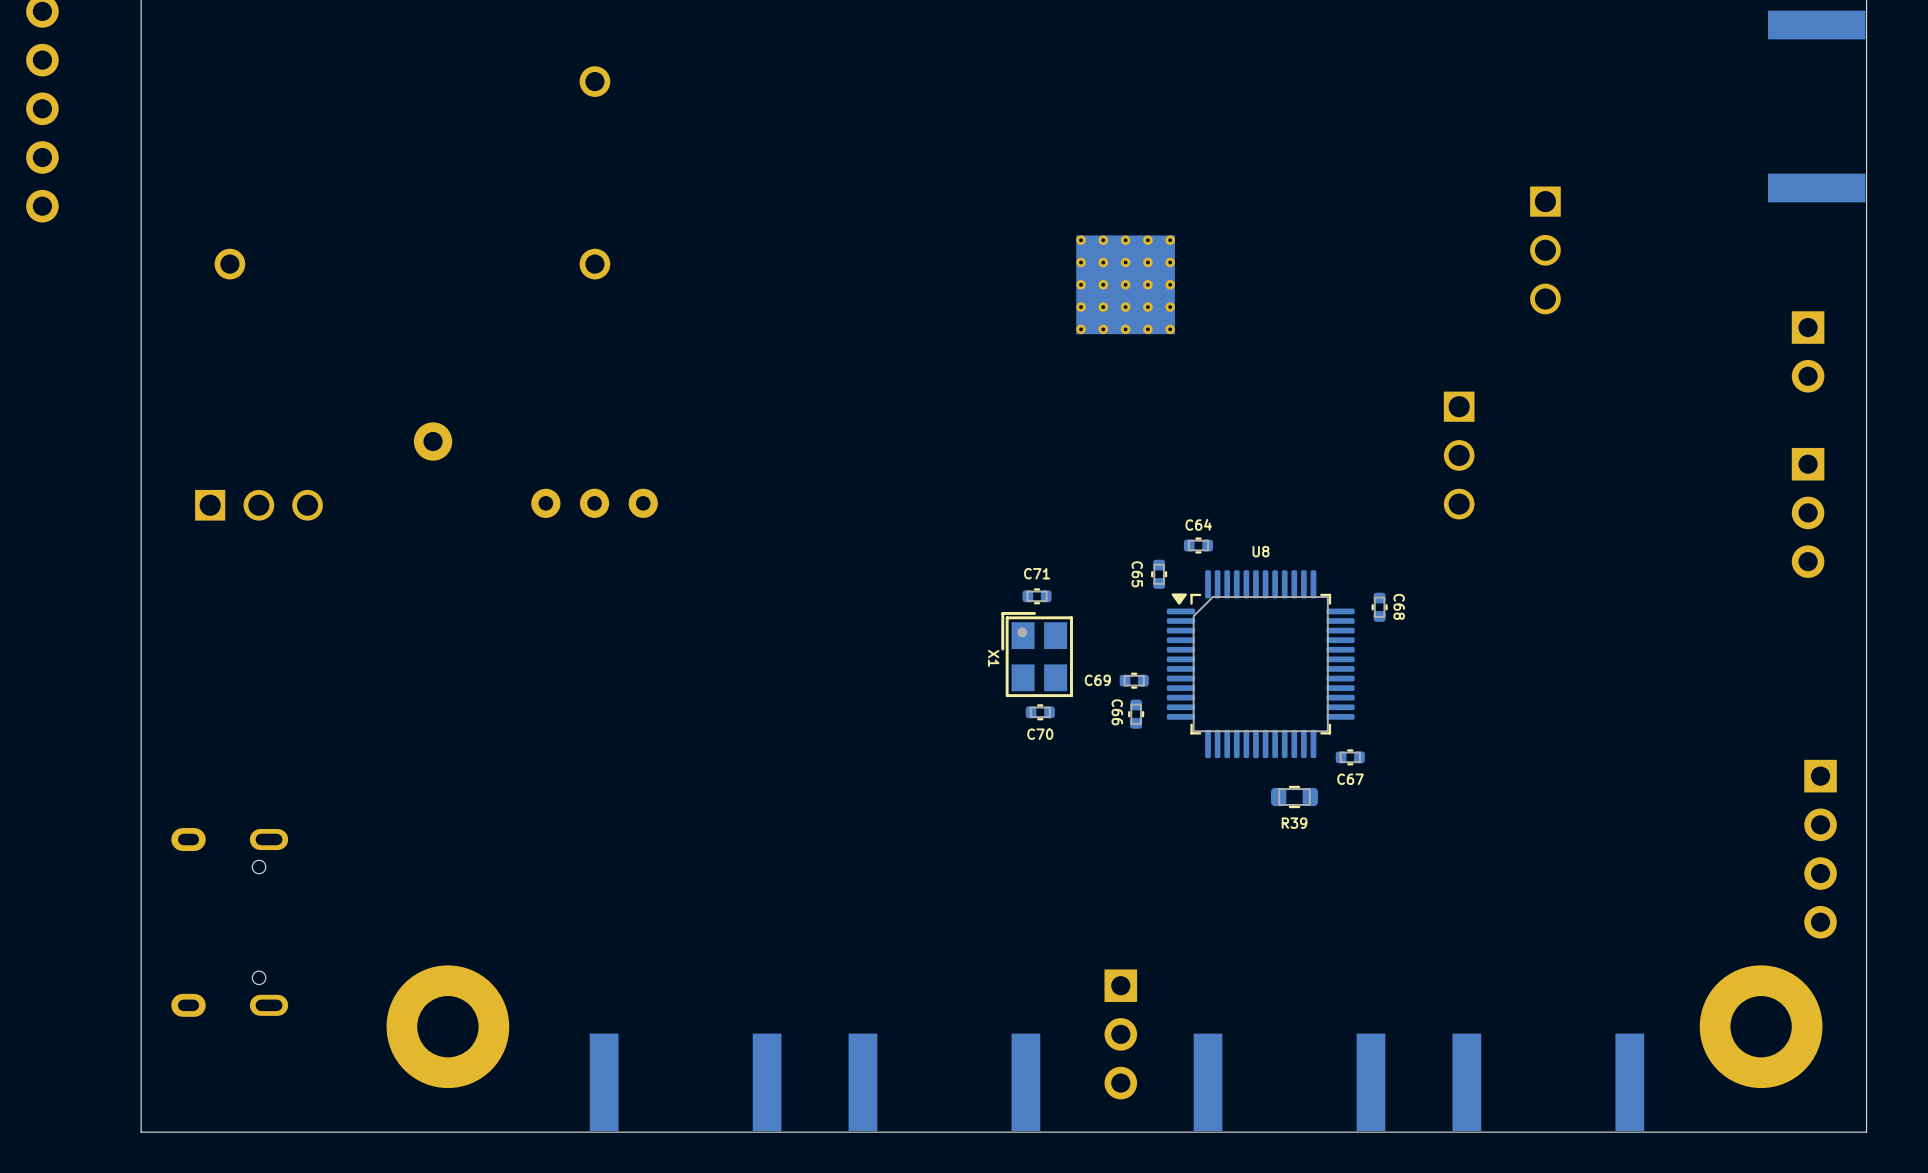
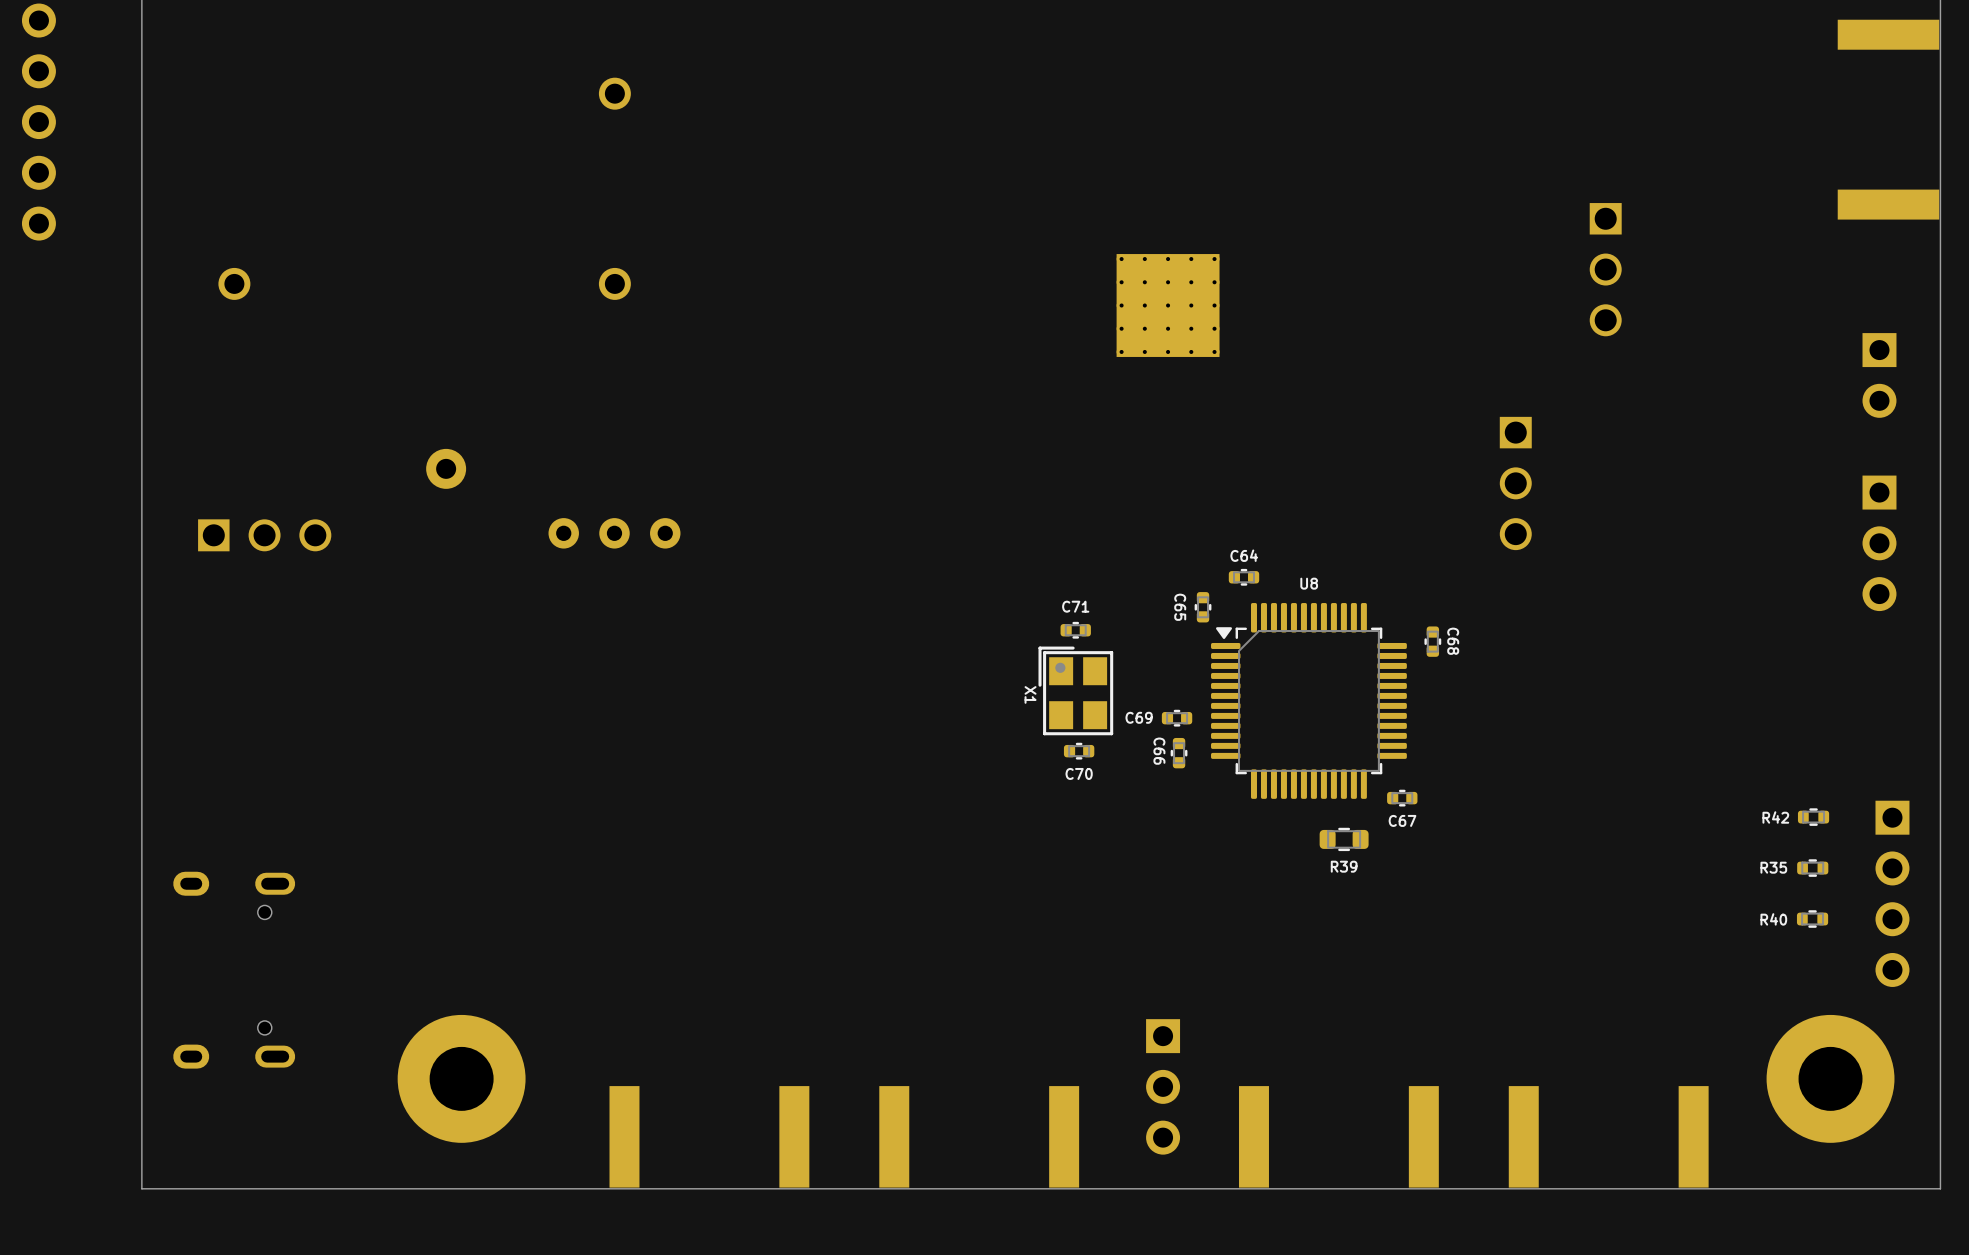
R42: none -> (1813, 817)
R35: none -> (1812, 868)
R40: none -> (1812, 919)

